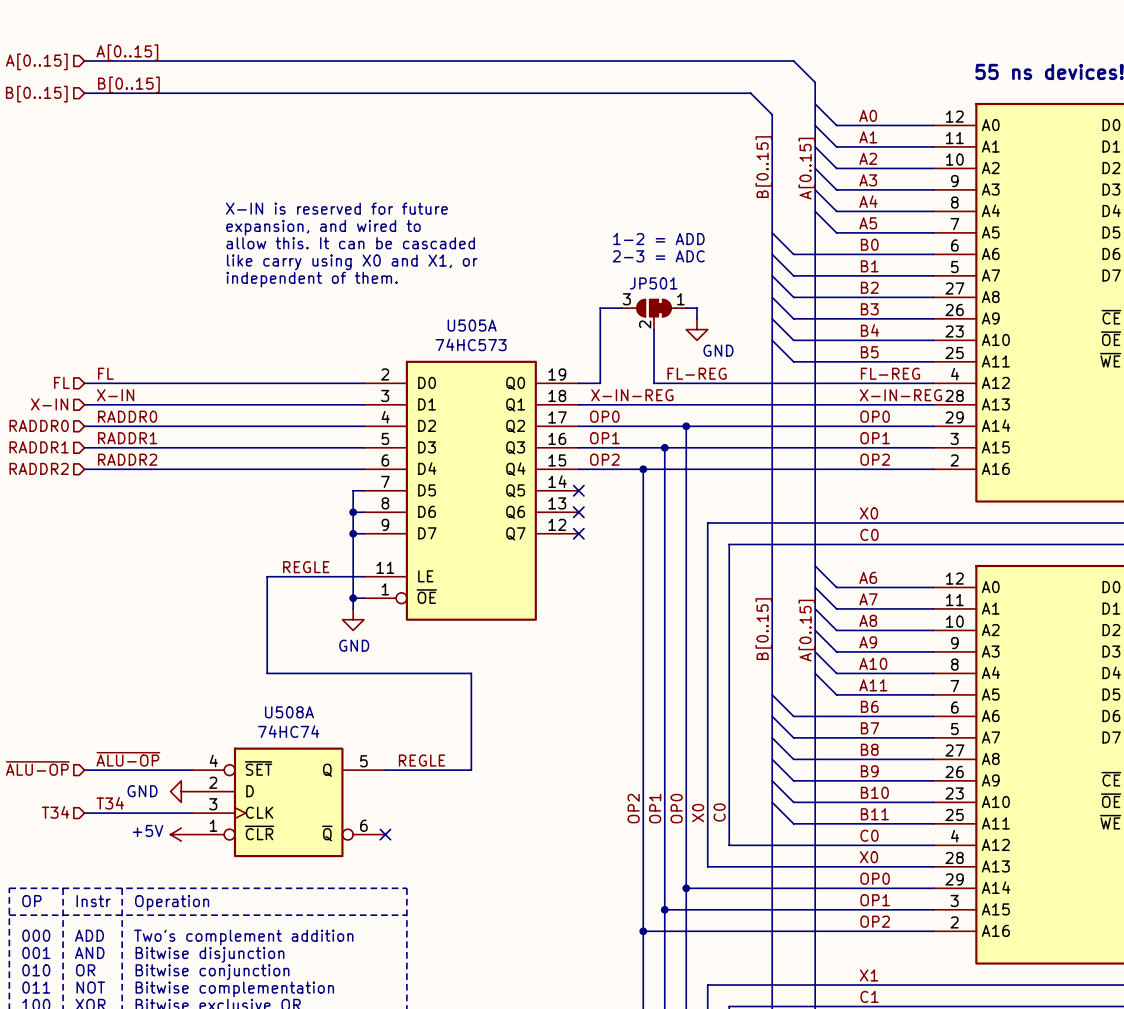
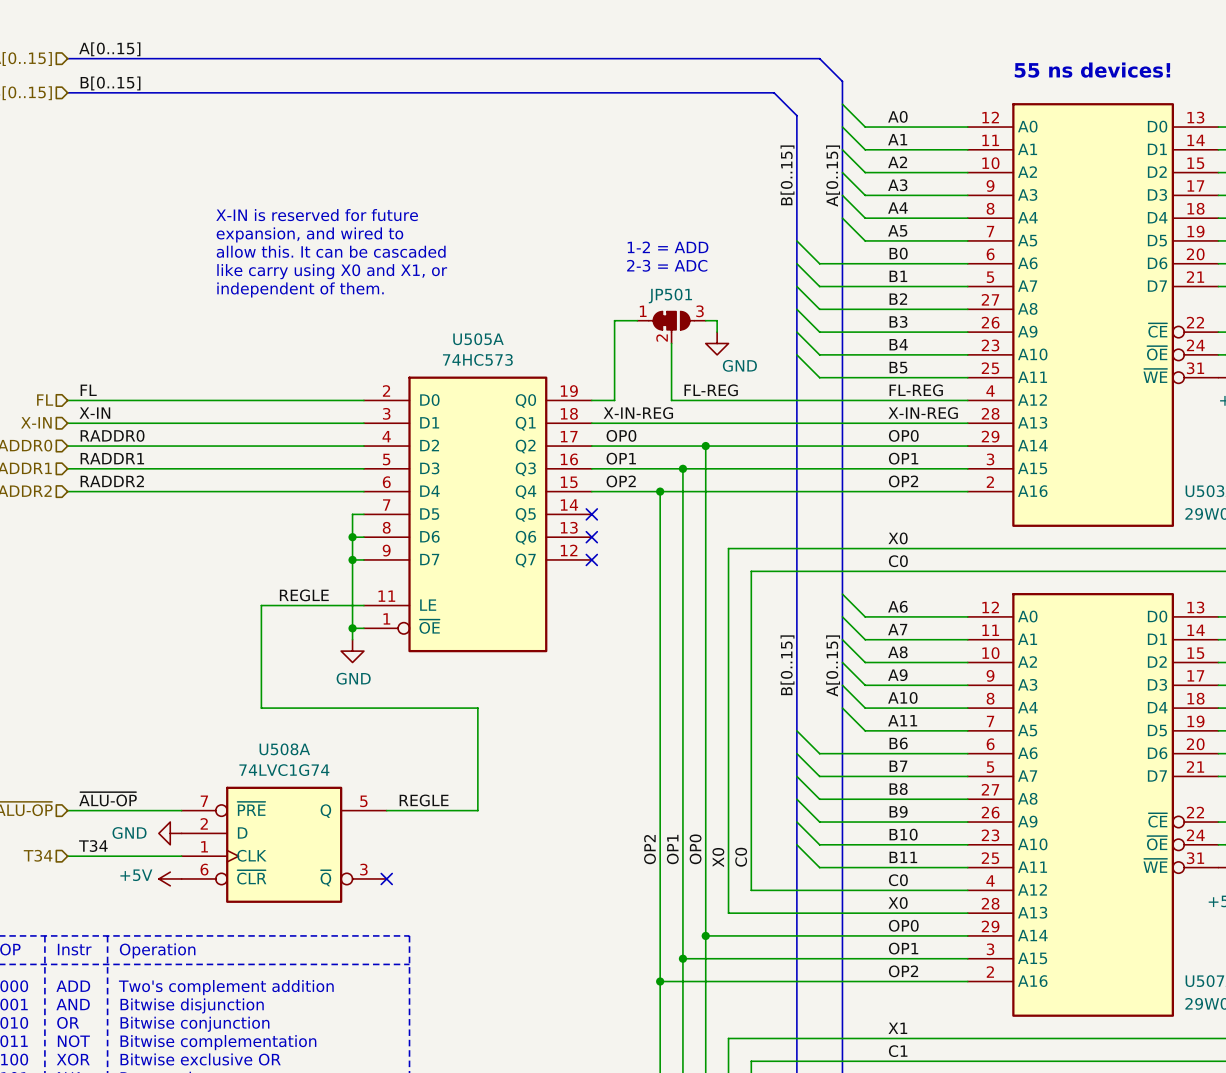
JP501 flip: as is (654, 309) -> left-right (671, 321)
U508A value: 74HC74 (288, 731) -> 74LVC1G74 (284, 770)
U508A pin number: 4 (213, 761) -> 7 (204, 801)
U508A pin name: ~{SET} (258, 768) -> ~{PRE} (251, 808)
U508A pin number: 3 (213, 804) -> 1 (204, 846)
U508A pin number: 1 (213, 825) -> 6 (204, 869)
U508A pin number: 6 (363, 825) -> 3 (363, 869)

